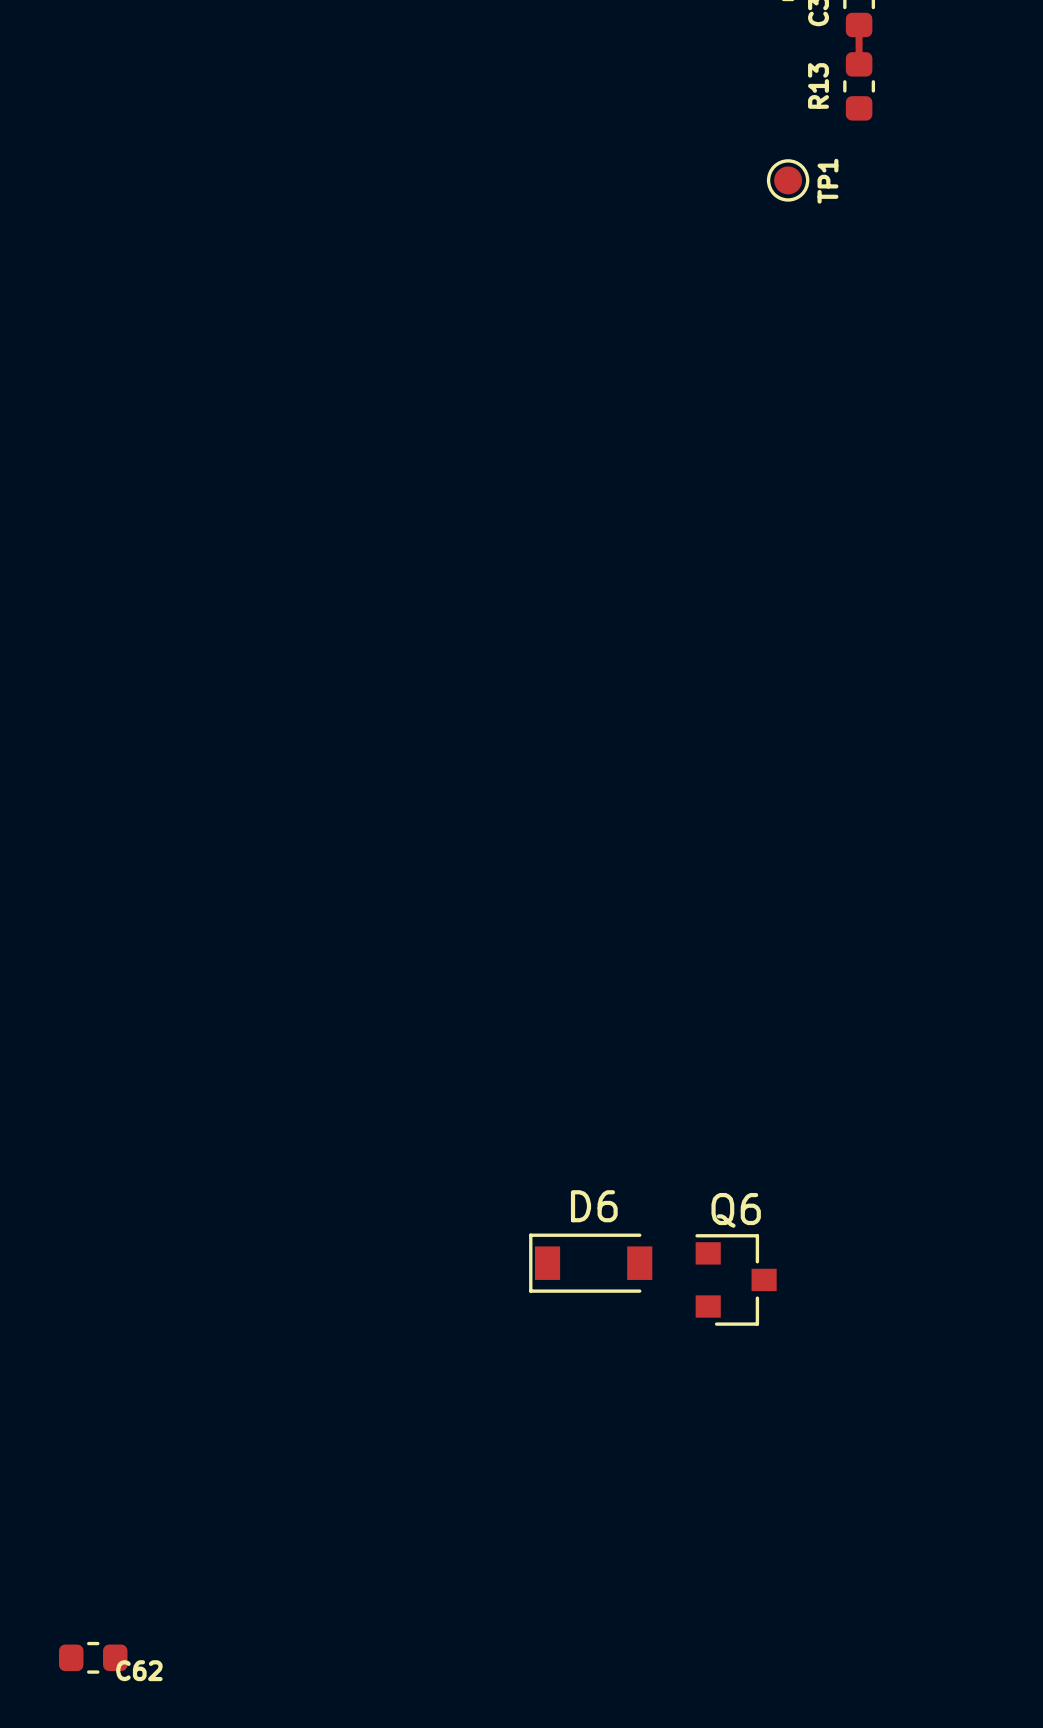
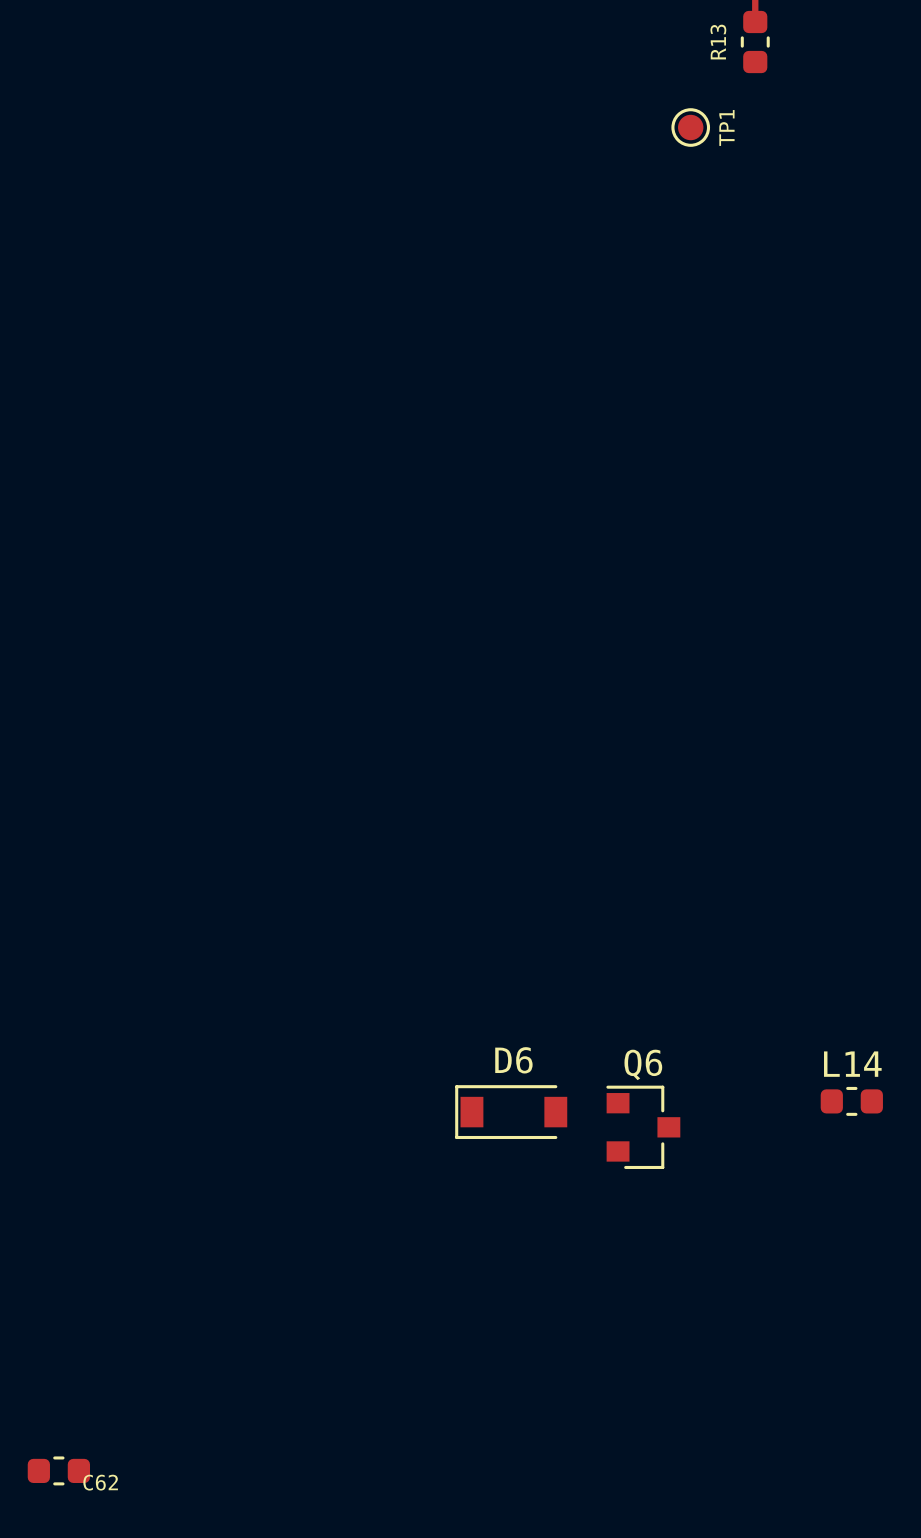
L14: none -> (851, 1101)

